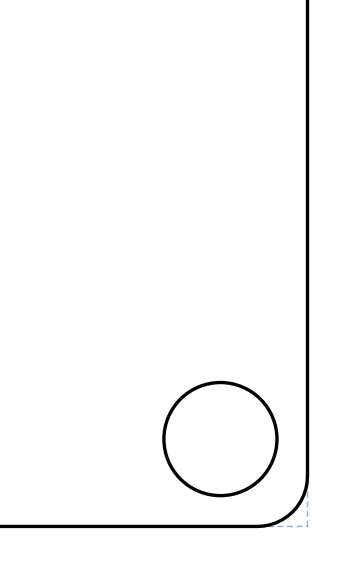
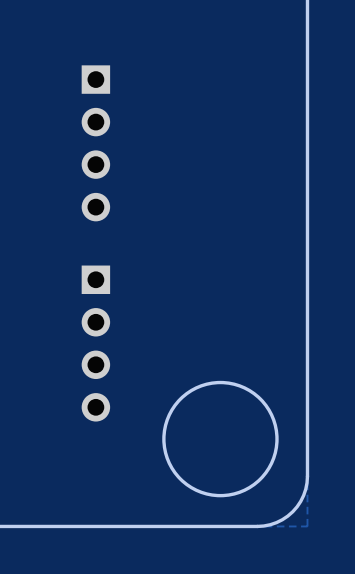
part: none -> (95, 143)
part: none -> (95, 343)

